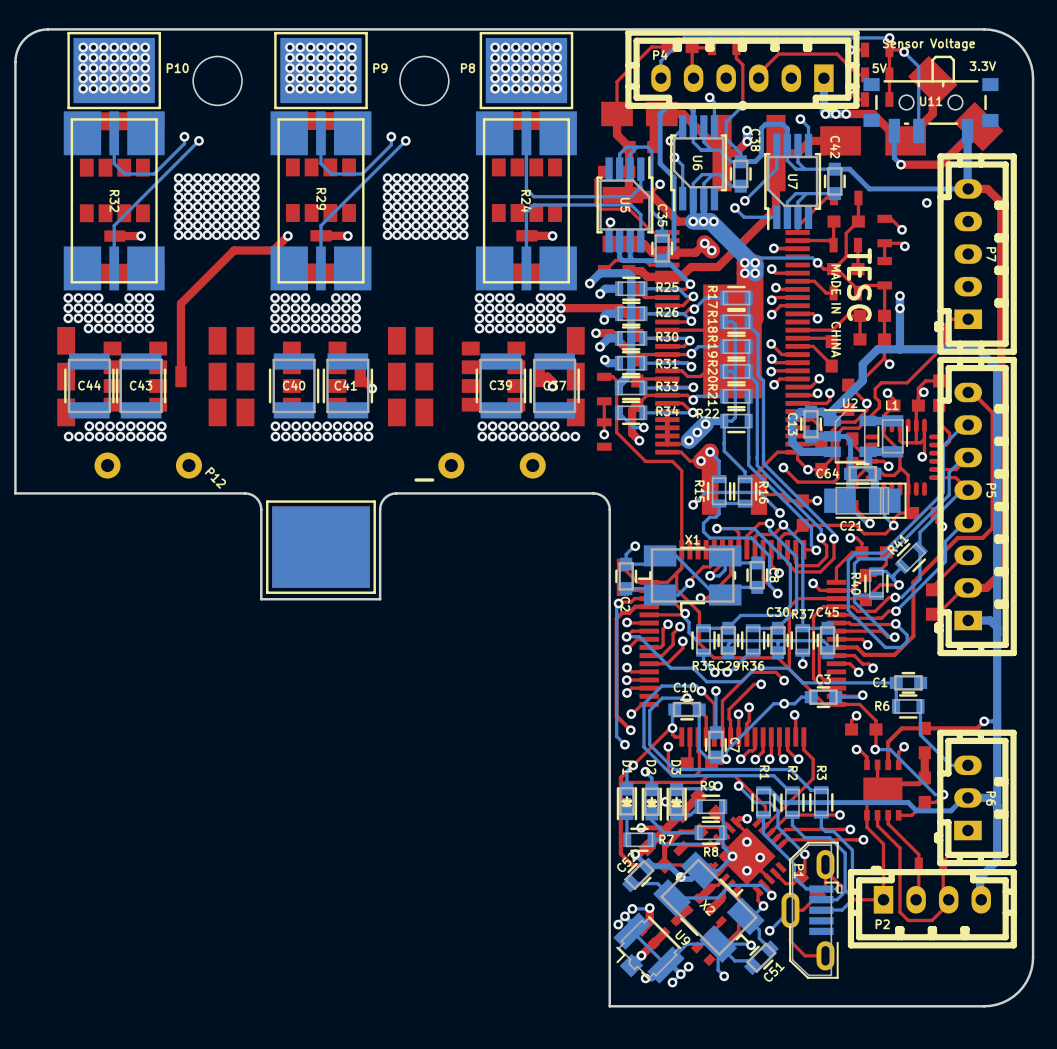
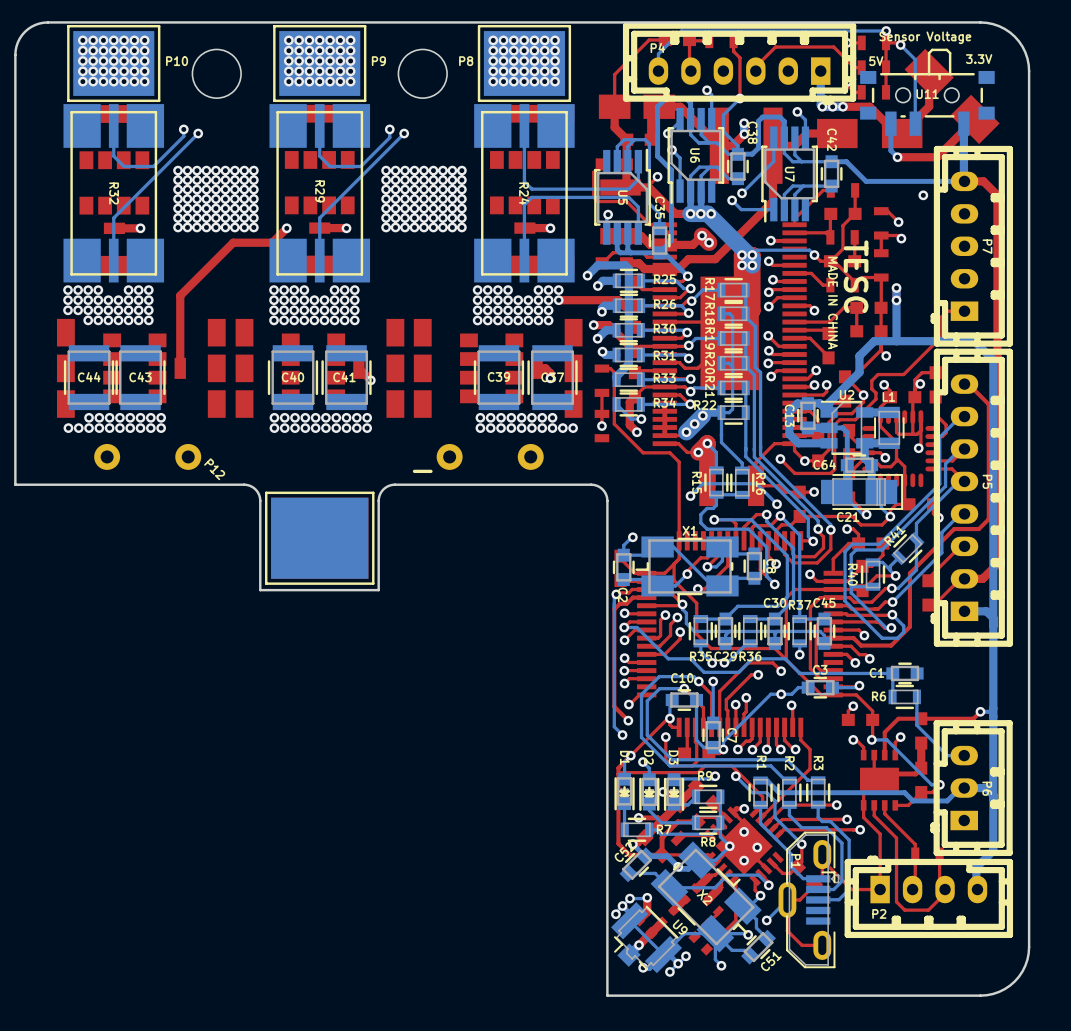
via: (560, 318) -> none

